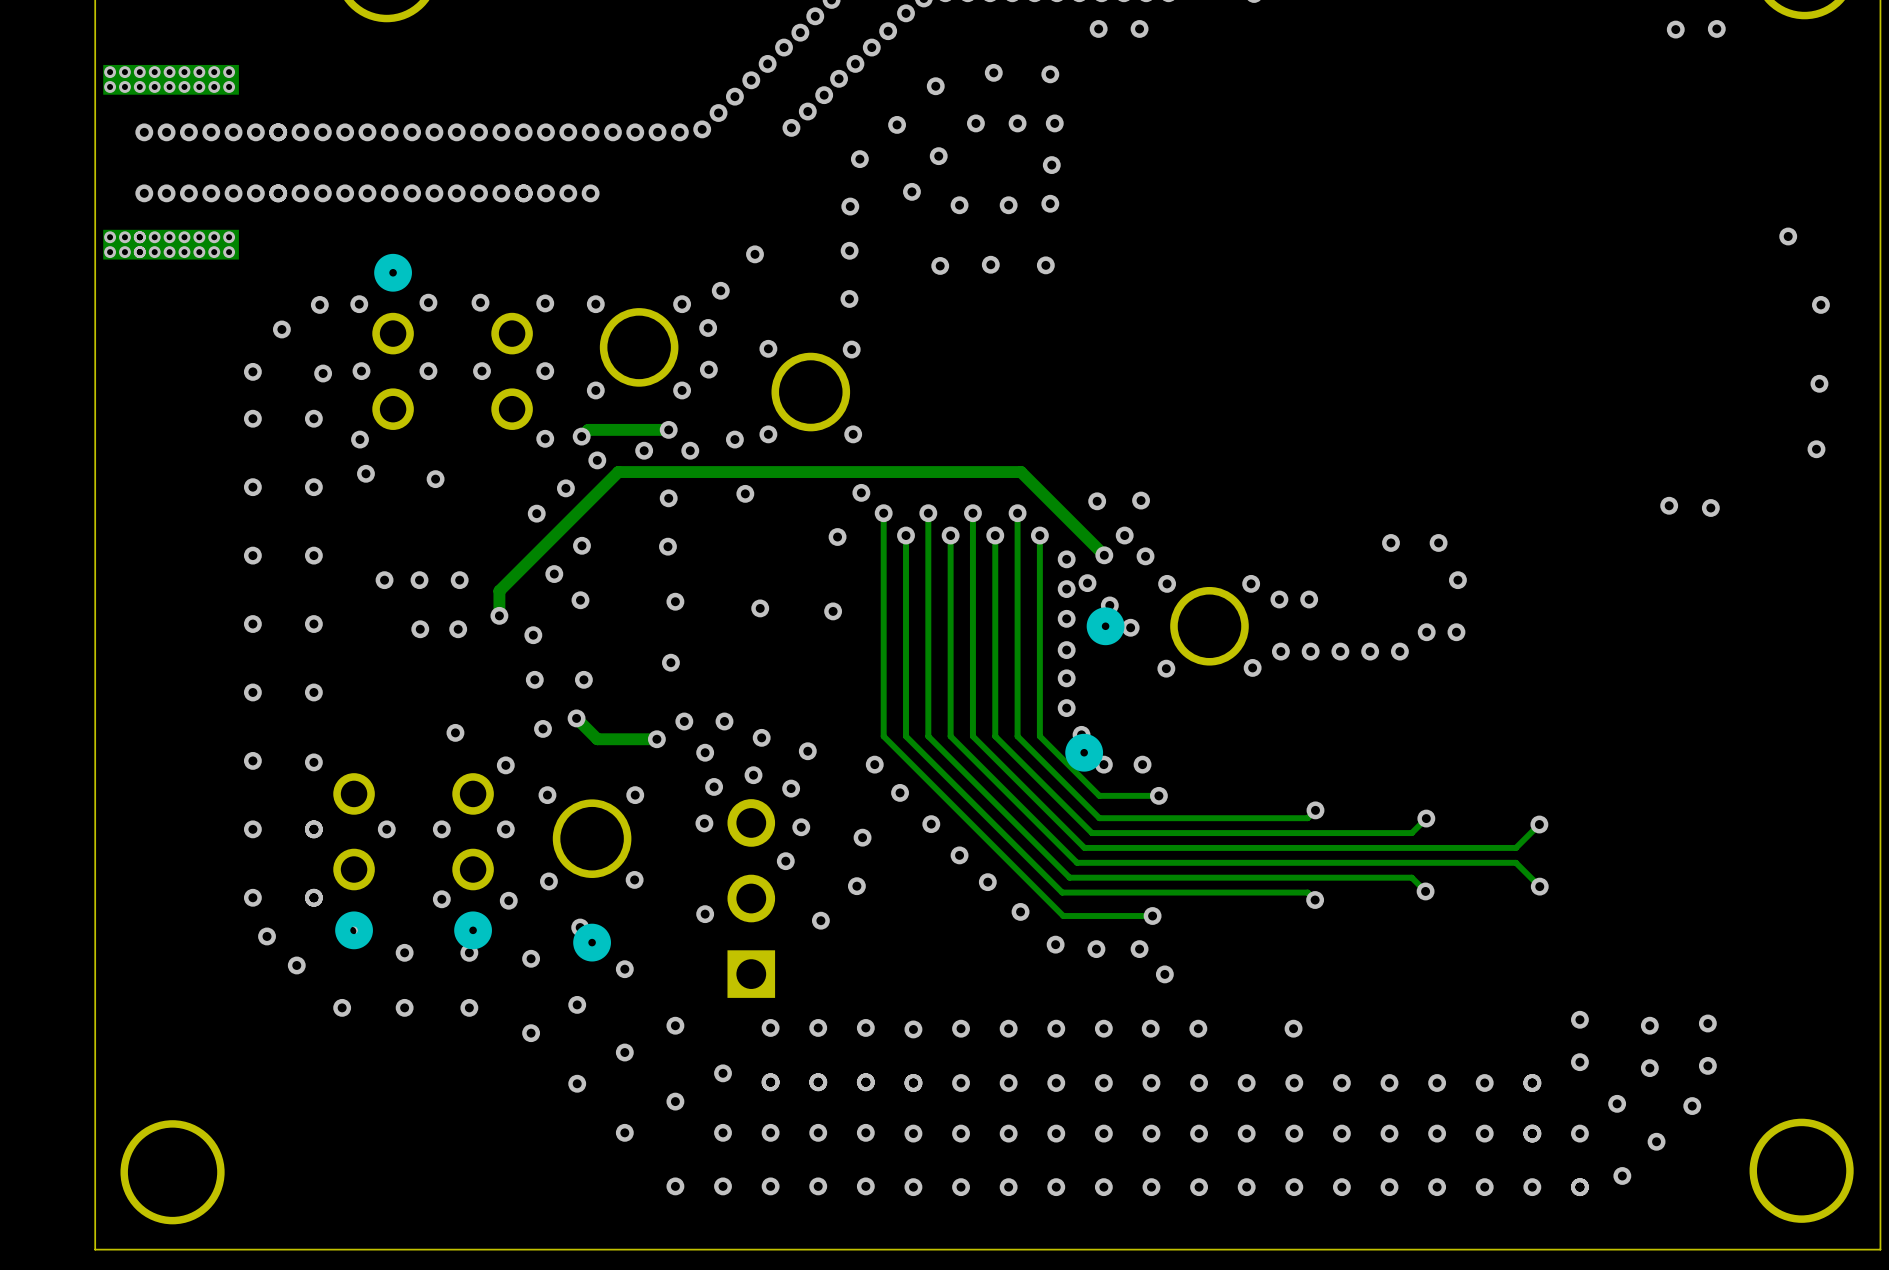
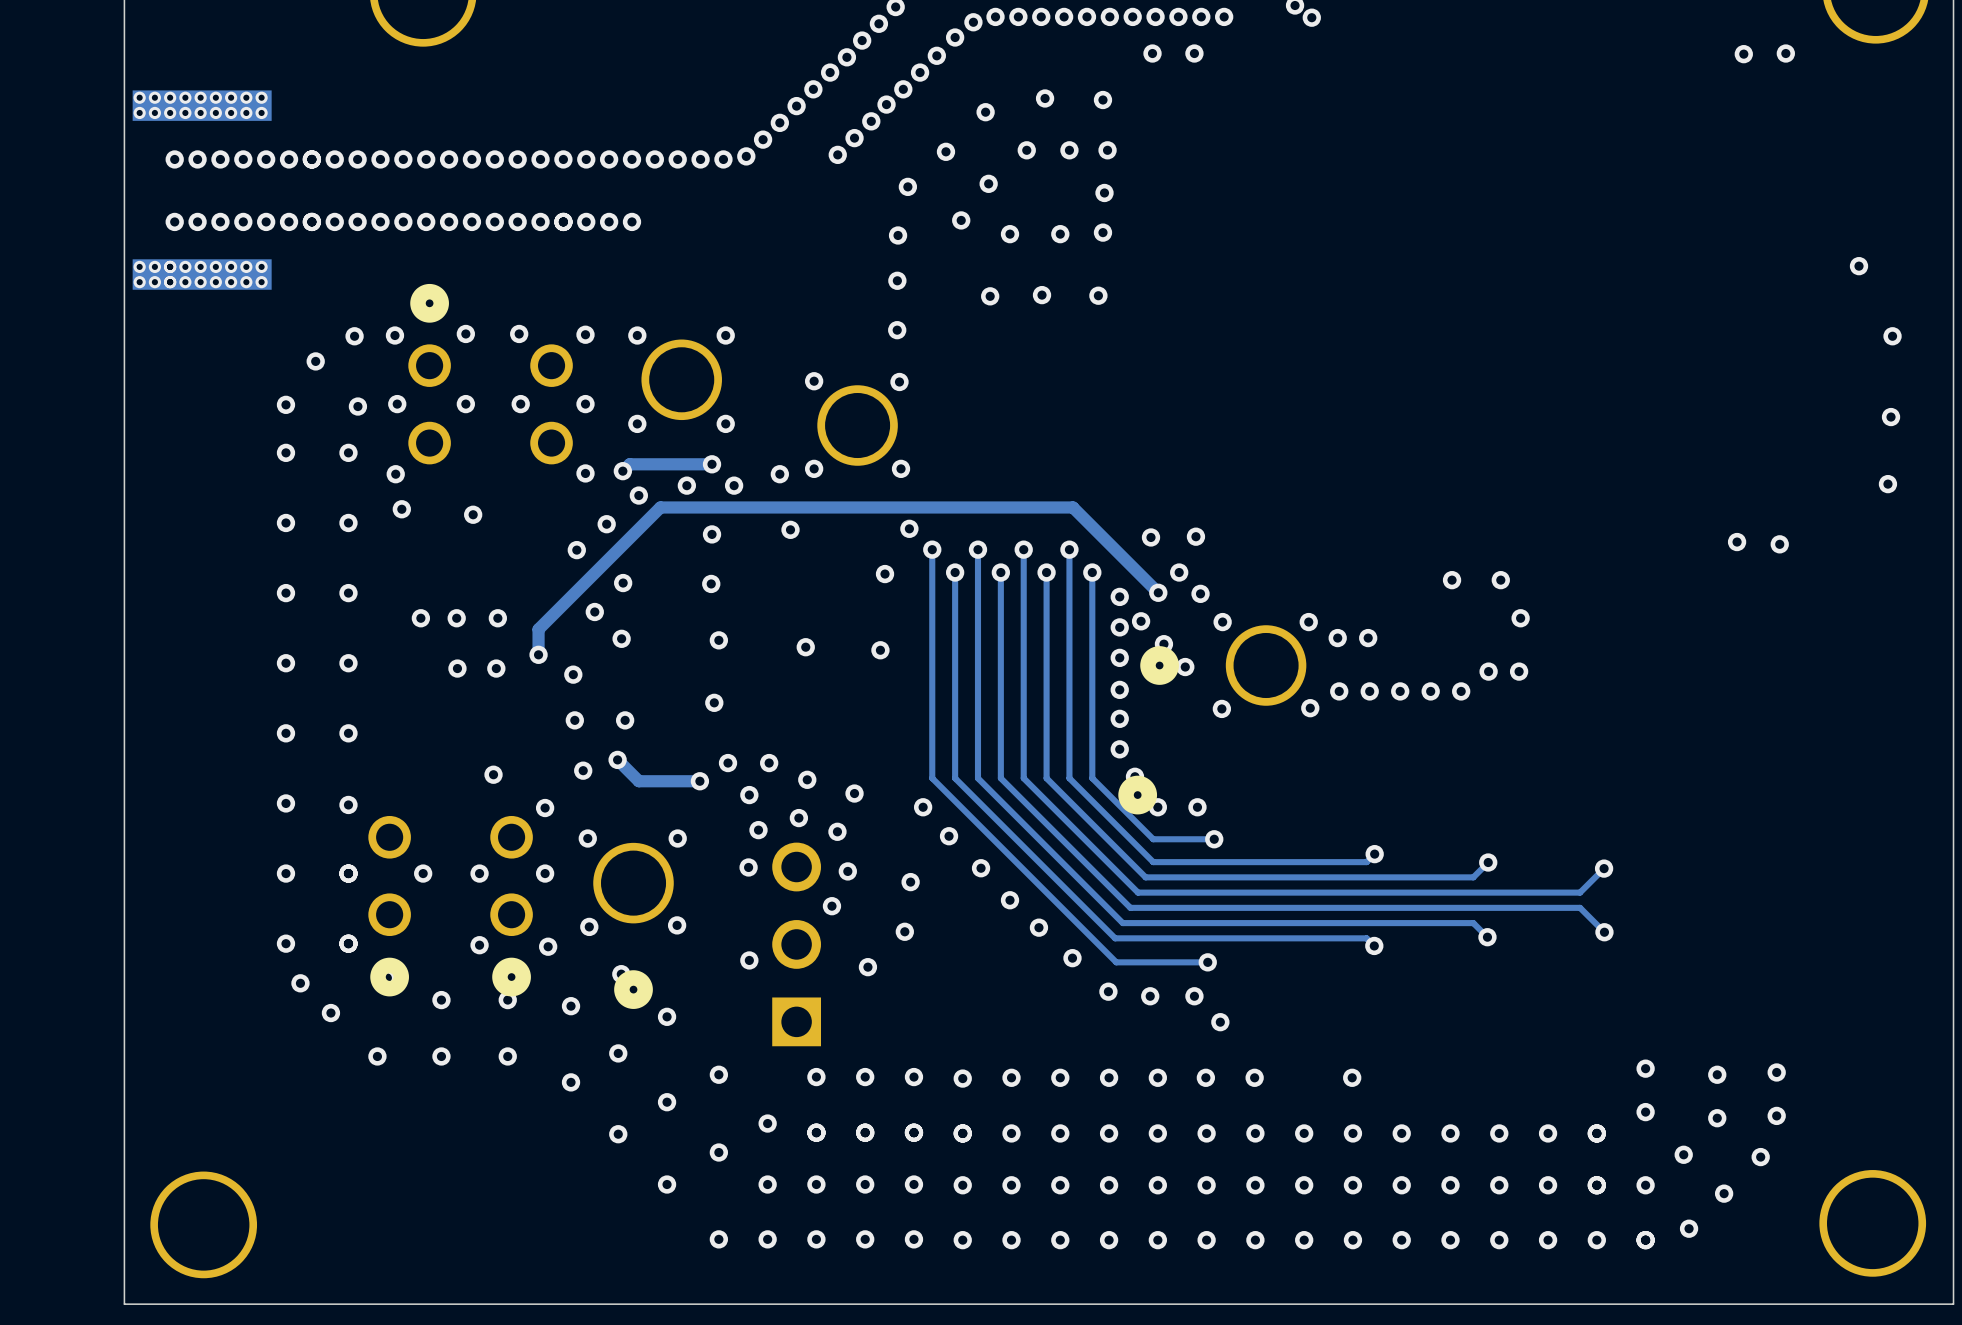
via: (755, 254) -> none
via: (720, 290) -> none
via: (708, 327) -> none
via: (708, 369) -> none

